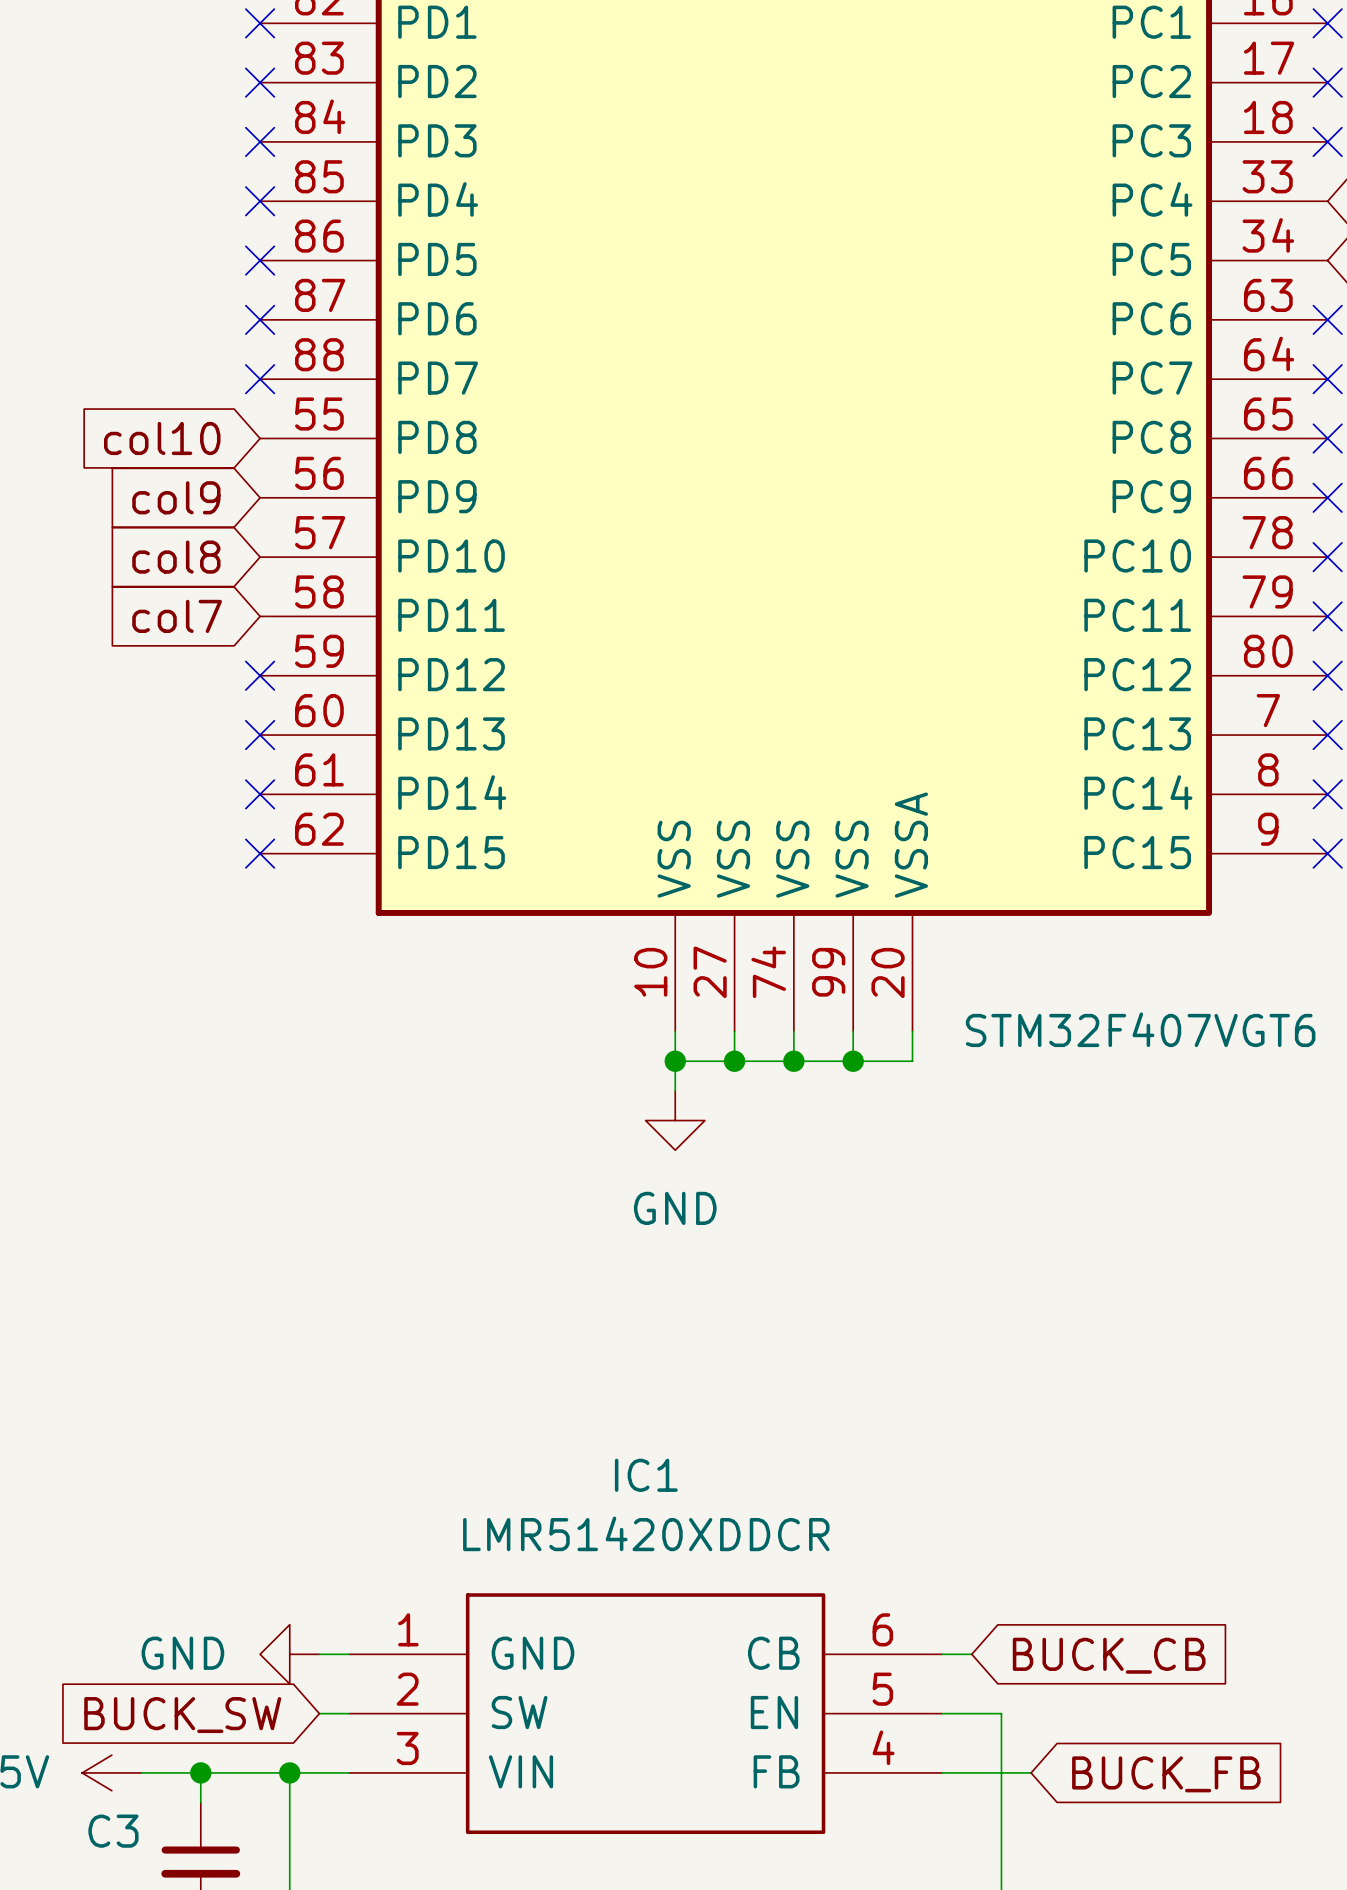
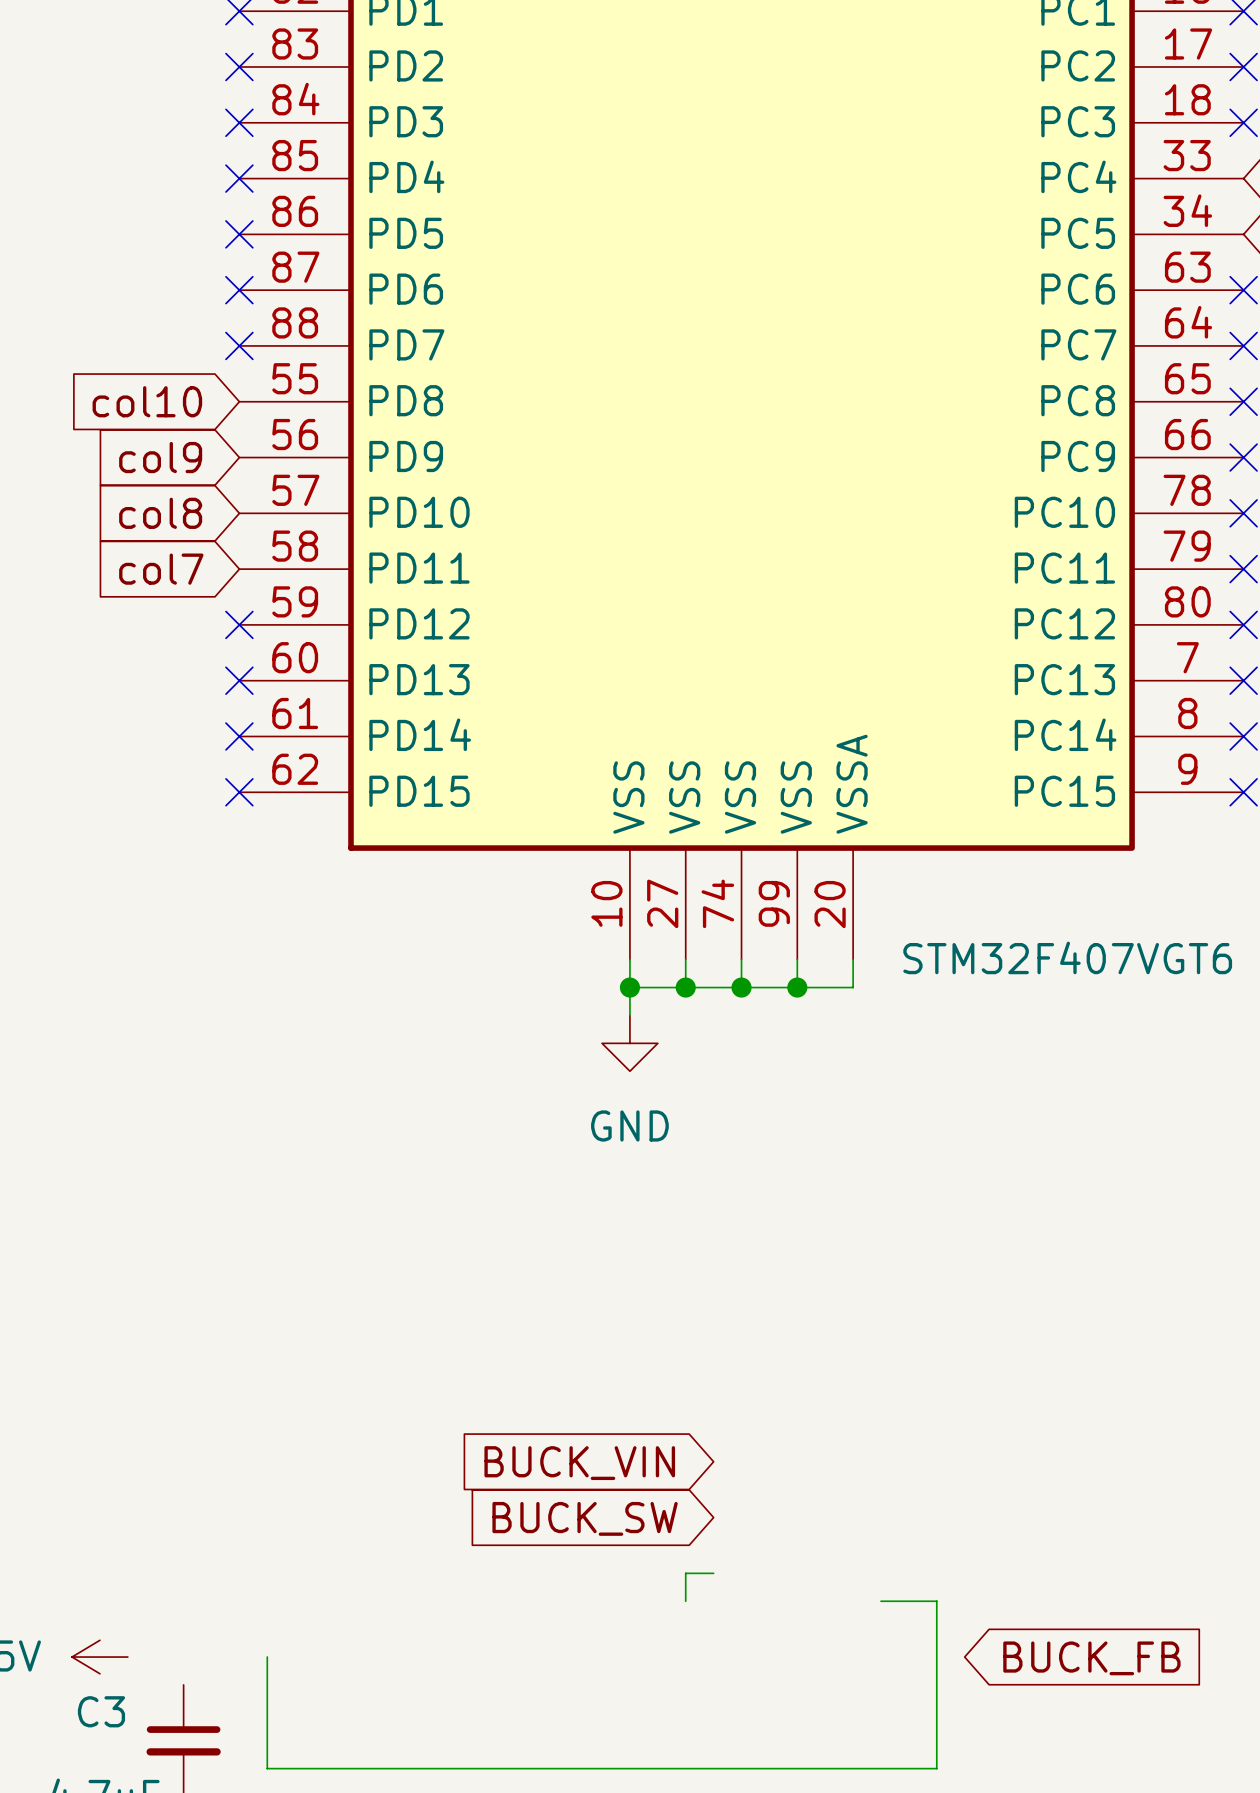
global label: none -> BUCK_VIN (579, 1463)
global label: none -> BUCK_SW (585, 1518)
power symbol: GND (289, 1654) -> none
wire: (319, 1654) (349, 1654) -> none
wire: (942, 1654) (971, 1654) -> none
global label: BUCK_CB (1109, 1655) -> none
wire: none -> (713, 1573) (685, 1573) (685, 1601)
wire: (319, 1713) (349, 1713) -> none
IC1: LMR51420XDDCR (645, 1713) -> none
global label: BUCK_SW (182, 1715) -> none
wire: (141, 1772) (349, 1772) -> none
wire: (200, 1772) (200, 1802) -> none
junction: (200, 1772) -> none
junction: (289, 1772) -> none
wire: (942, 1772) (1031, 1772) -> none

